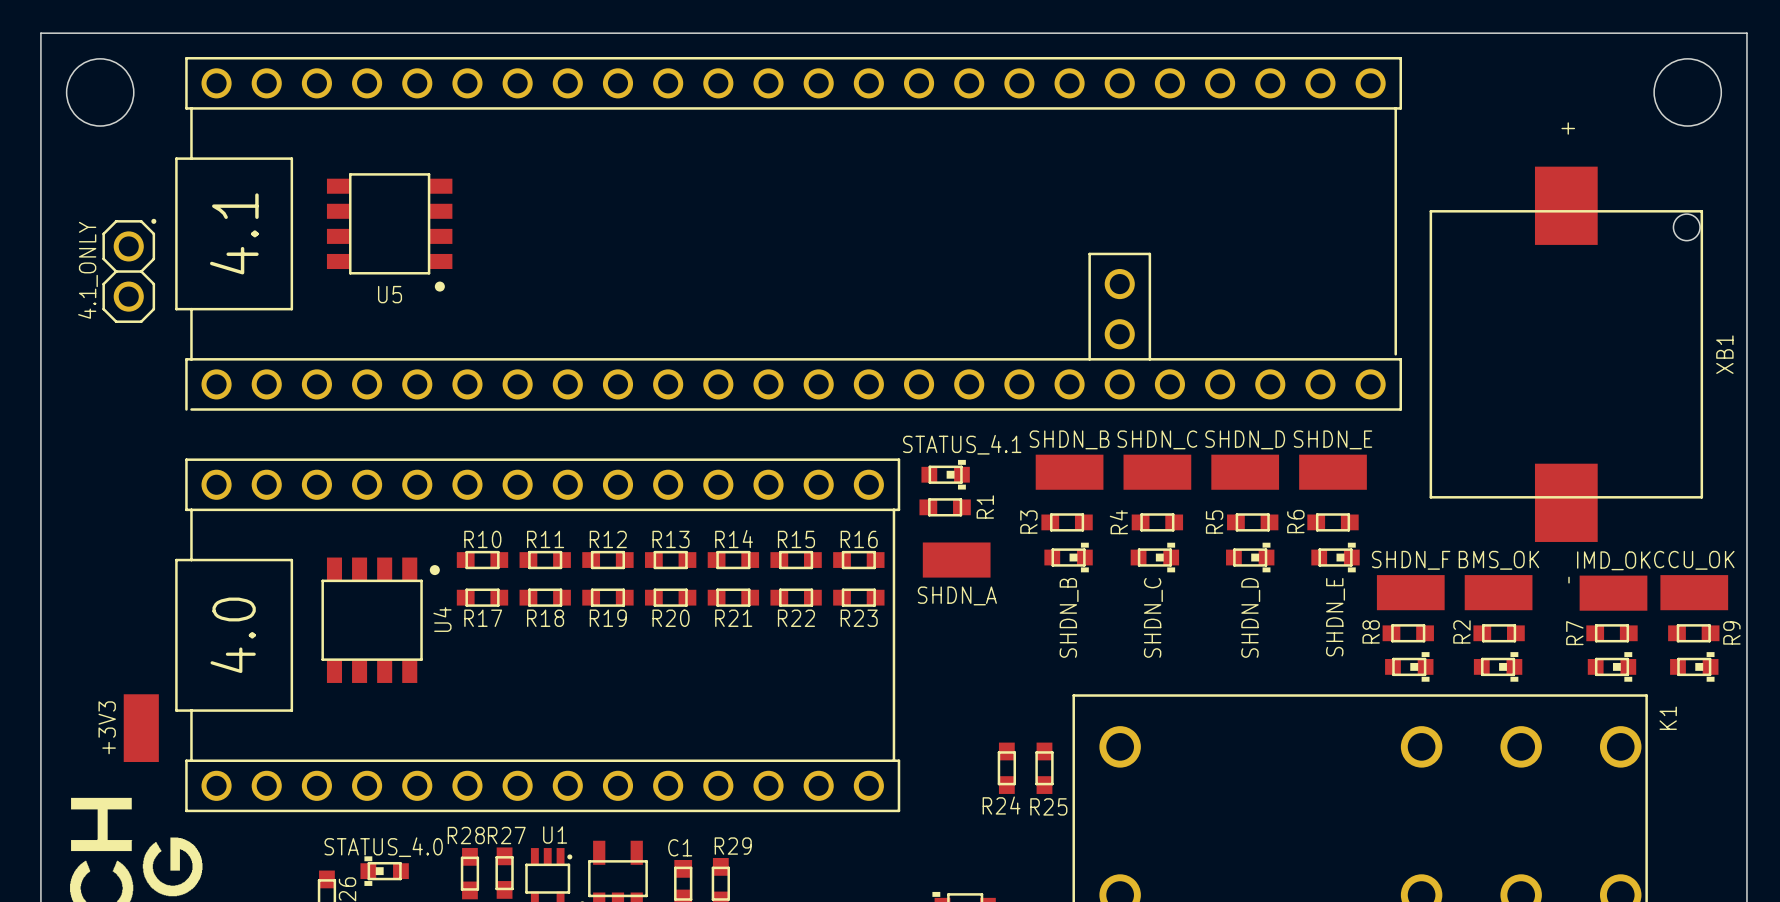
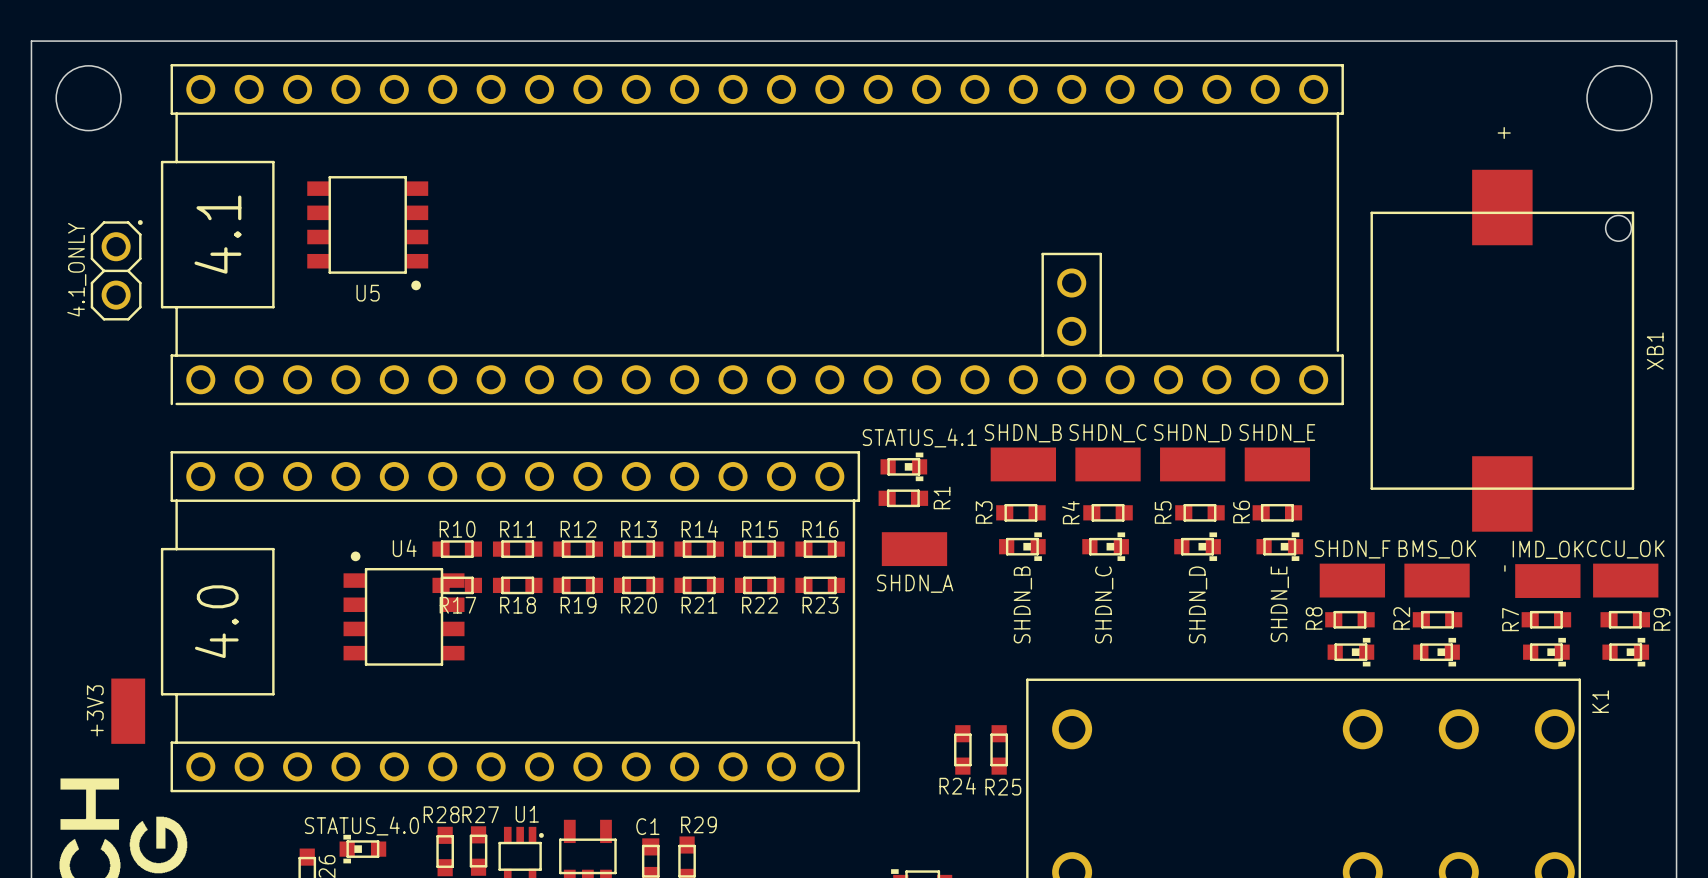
U4 rotation: 0° (380, 620) -> 90° counterclockwise (404, 608)

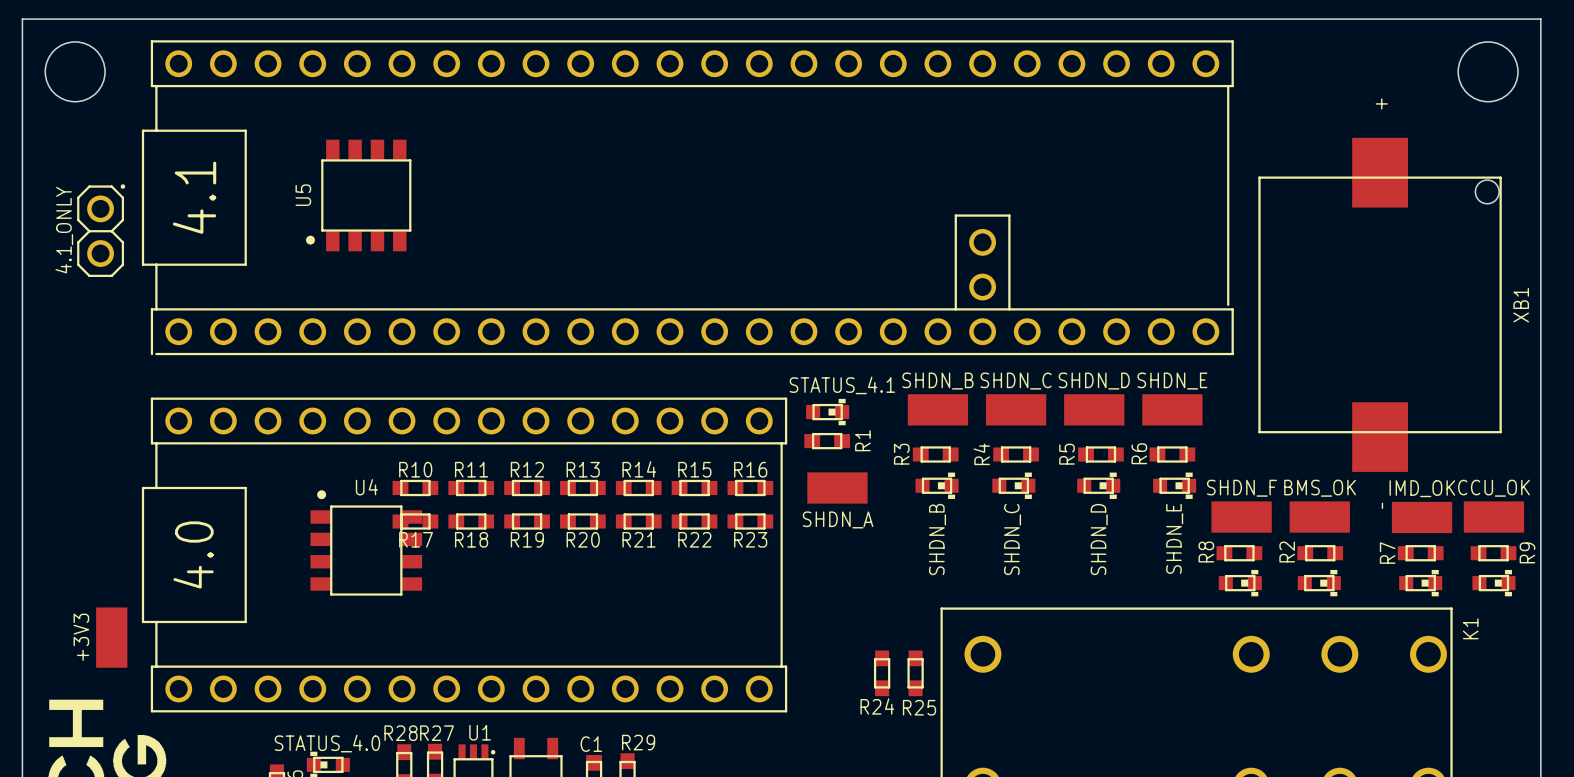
U5 rotation: 0° (367, 233) -> 90° clockwise (358, 195)

